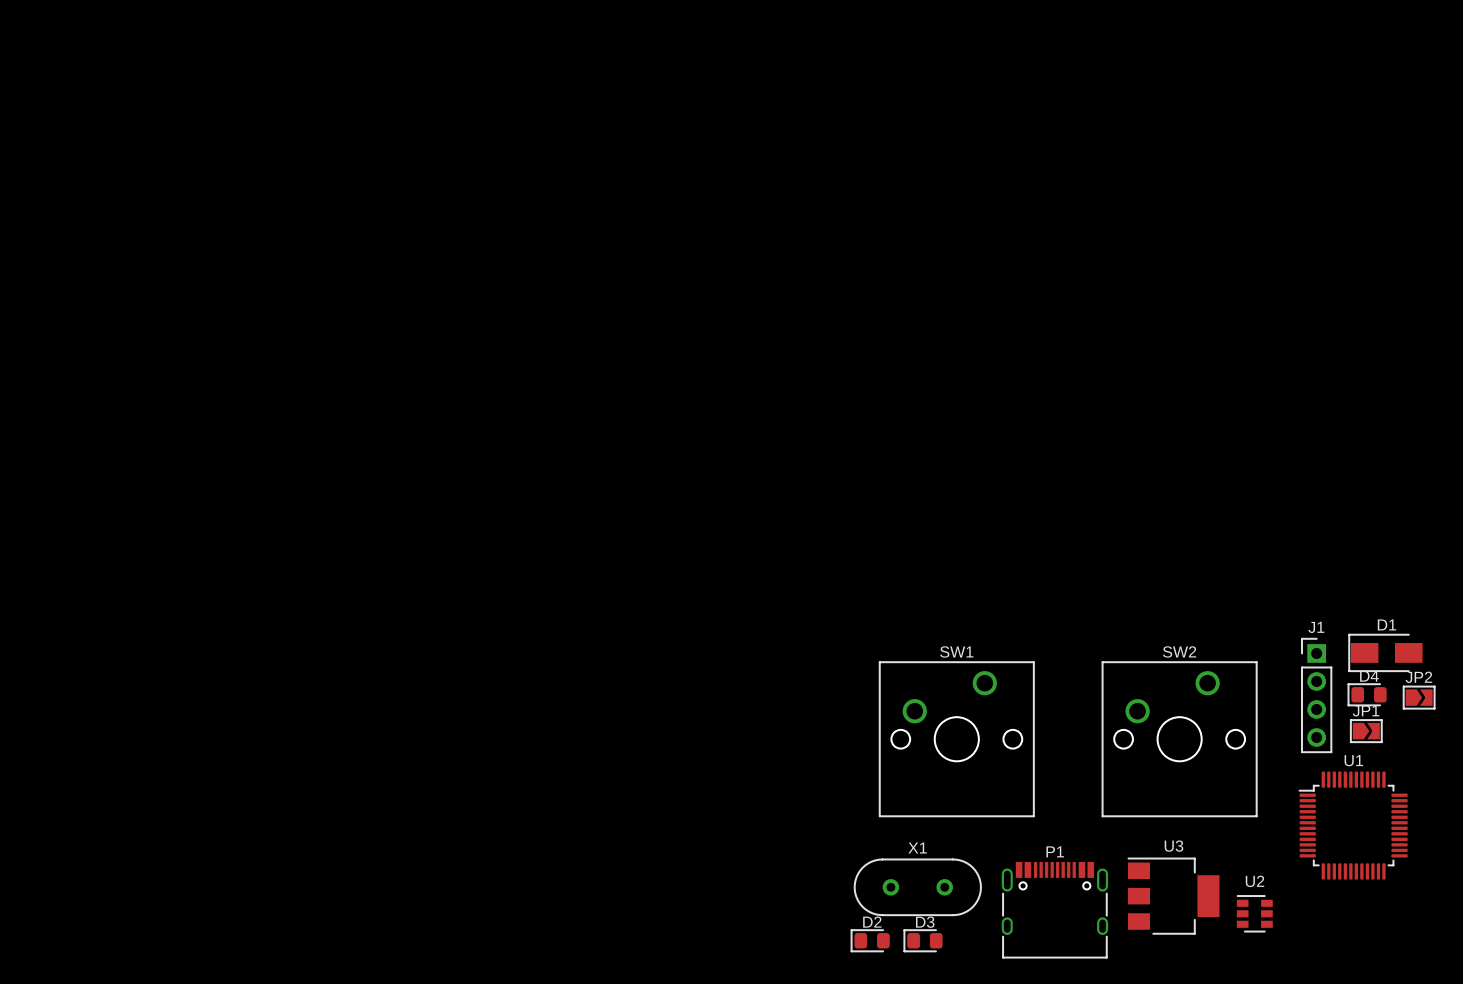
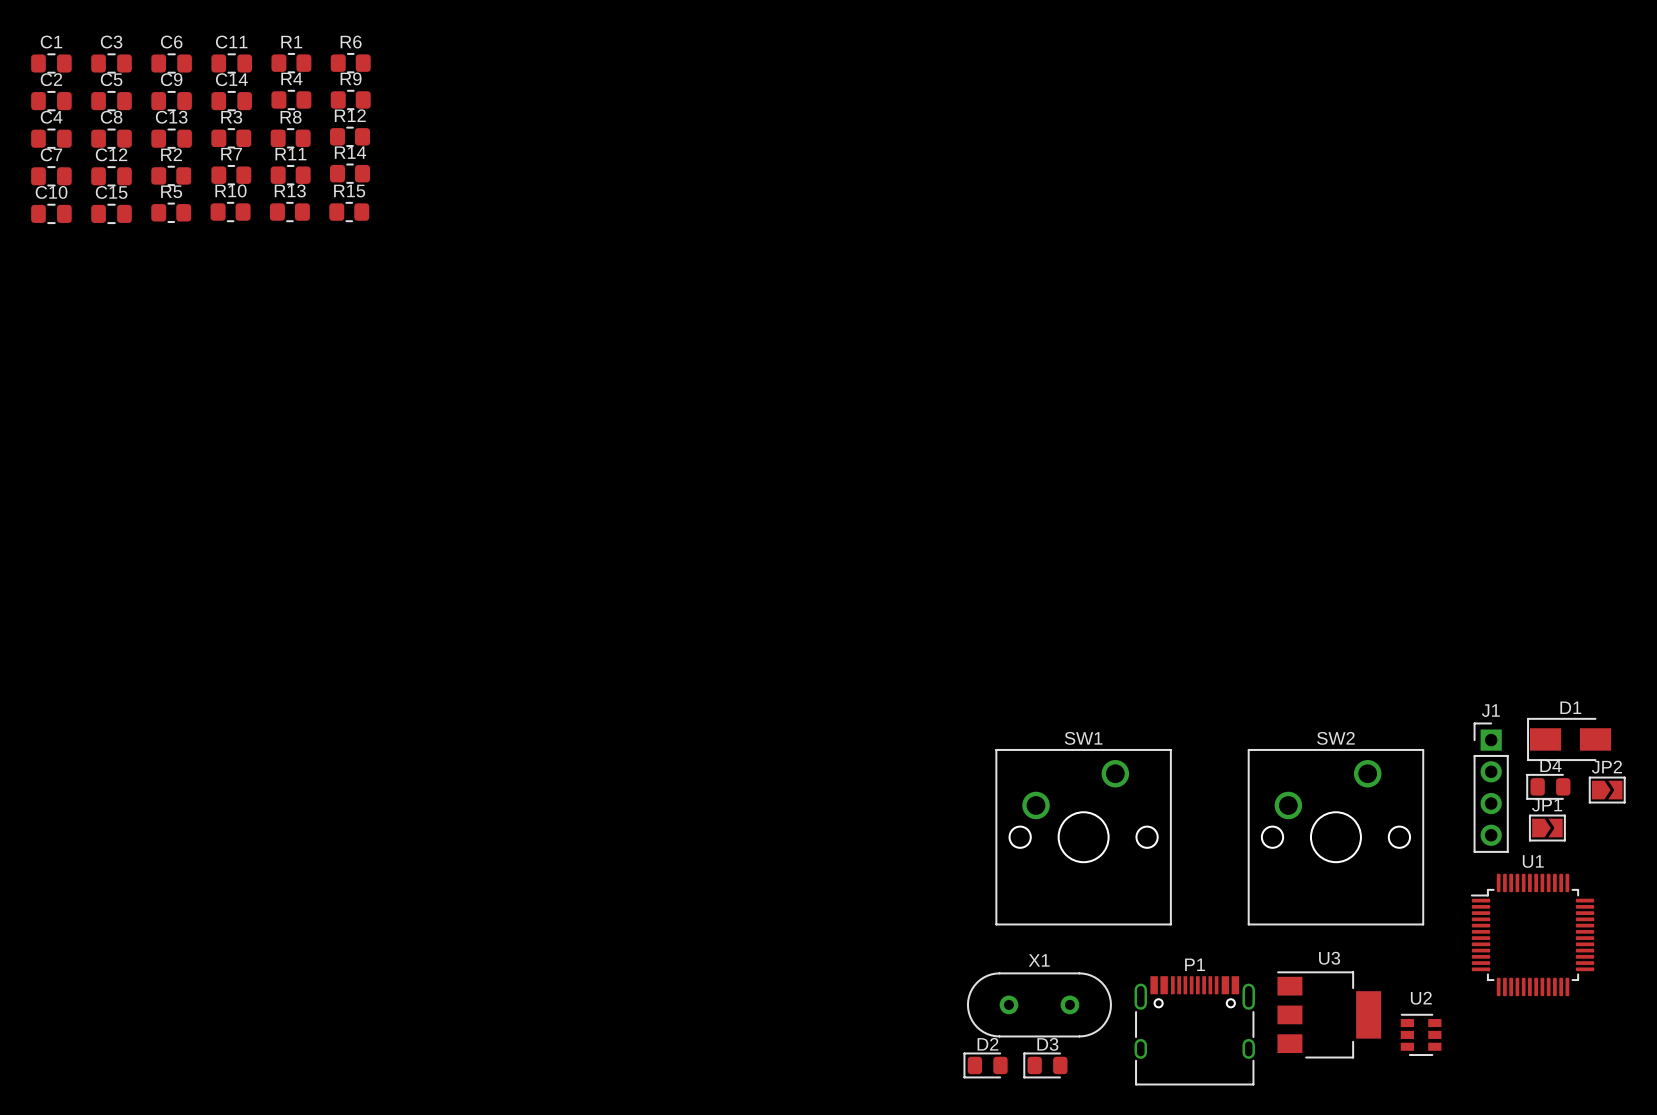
R1: none -> (291, 63)
R6: none -> (350, 63)
C1: none -> (51, 63)
C3: none -> (111, 63)
C6: none -> (171, 63)
C11: none -> (231, 63)
R4: none -> (291, 99)
R9: none -> (350, 99)
C2: none -> (51, 101)
C5: none -> (111, 101)
C9: none -> (171, 101)
C14: none -> (231, 101)
R12: none -> (350, 136)
C4: none -> (51, 138)
C8: none -> (111, 138)
C13: none -> (171, 138)
R3: none -> (231, 138)
R8: none -> (290, 138)
R14: none -> (350, 173)
R7: none -> (231, 175)
R11: none -> (290, 175)
C7: none -> (51, 176)
C12: none -> (111, 176)
R2: none -> (171, 175)
R5: none -> (171, 212)
R10: none -> (230, 212)
R13: none -> (289, 212)
R15: none -> (349, 212)
C10: none -> (51, 213)
C15: none -> (111, 213)

